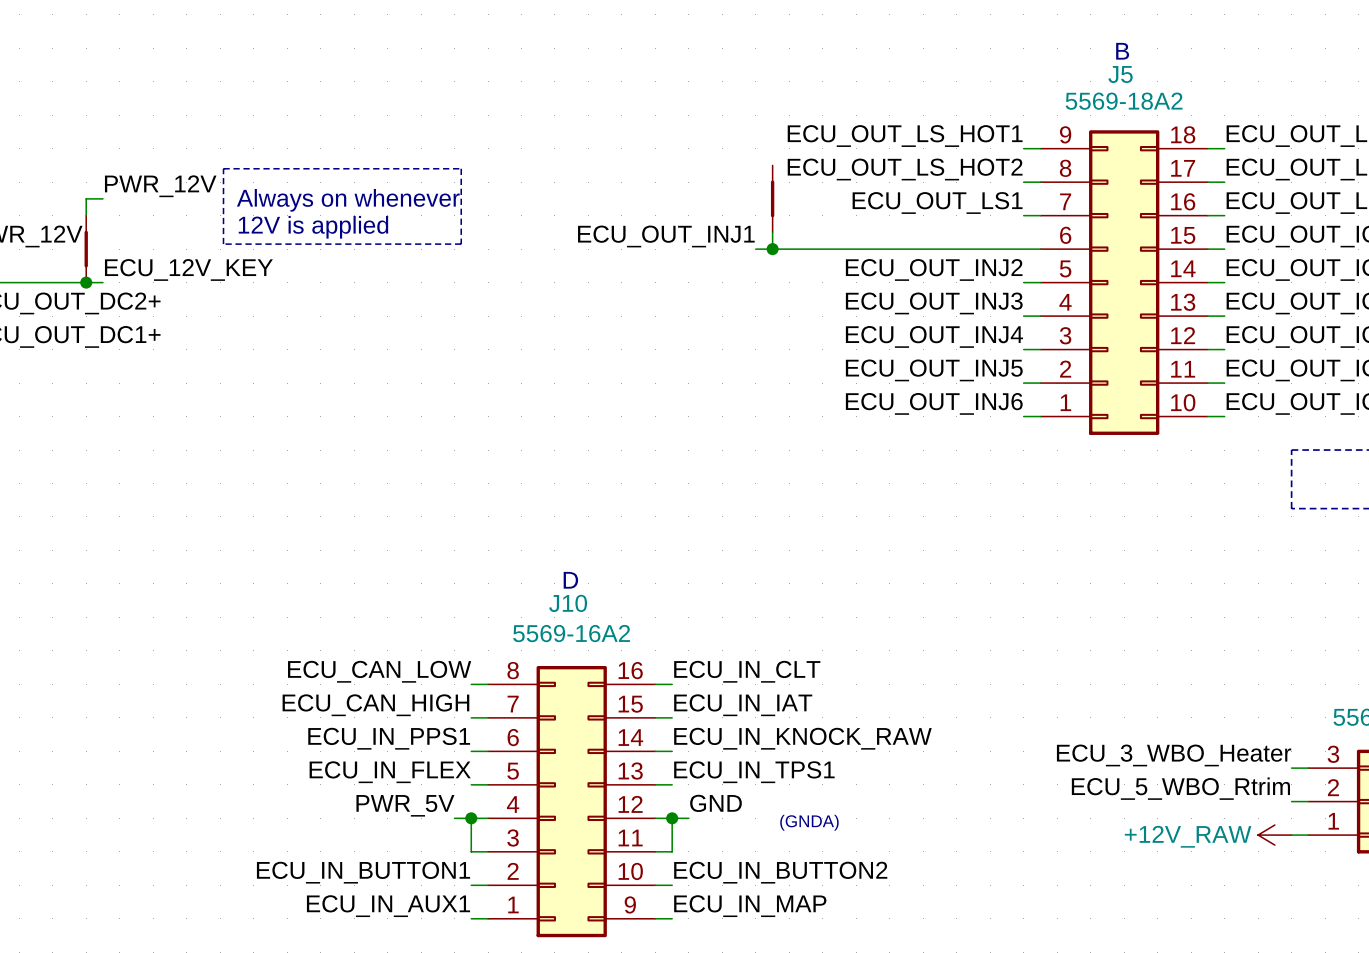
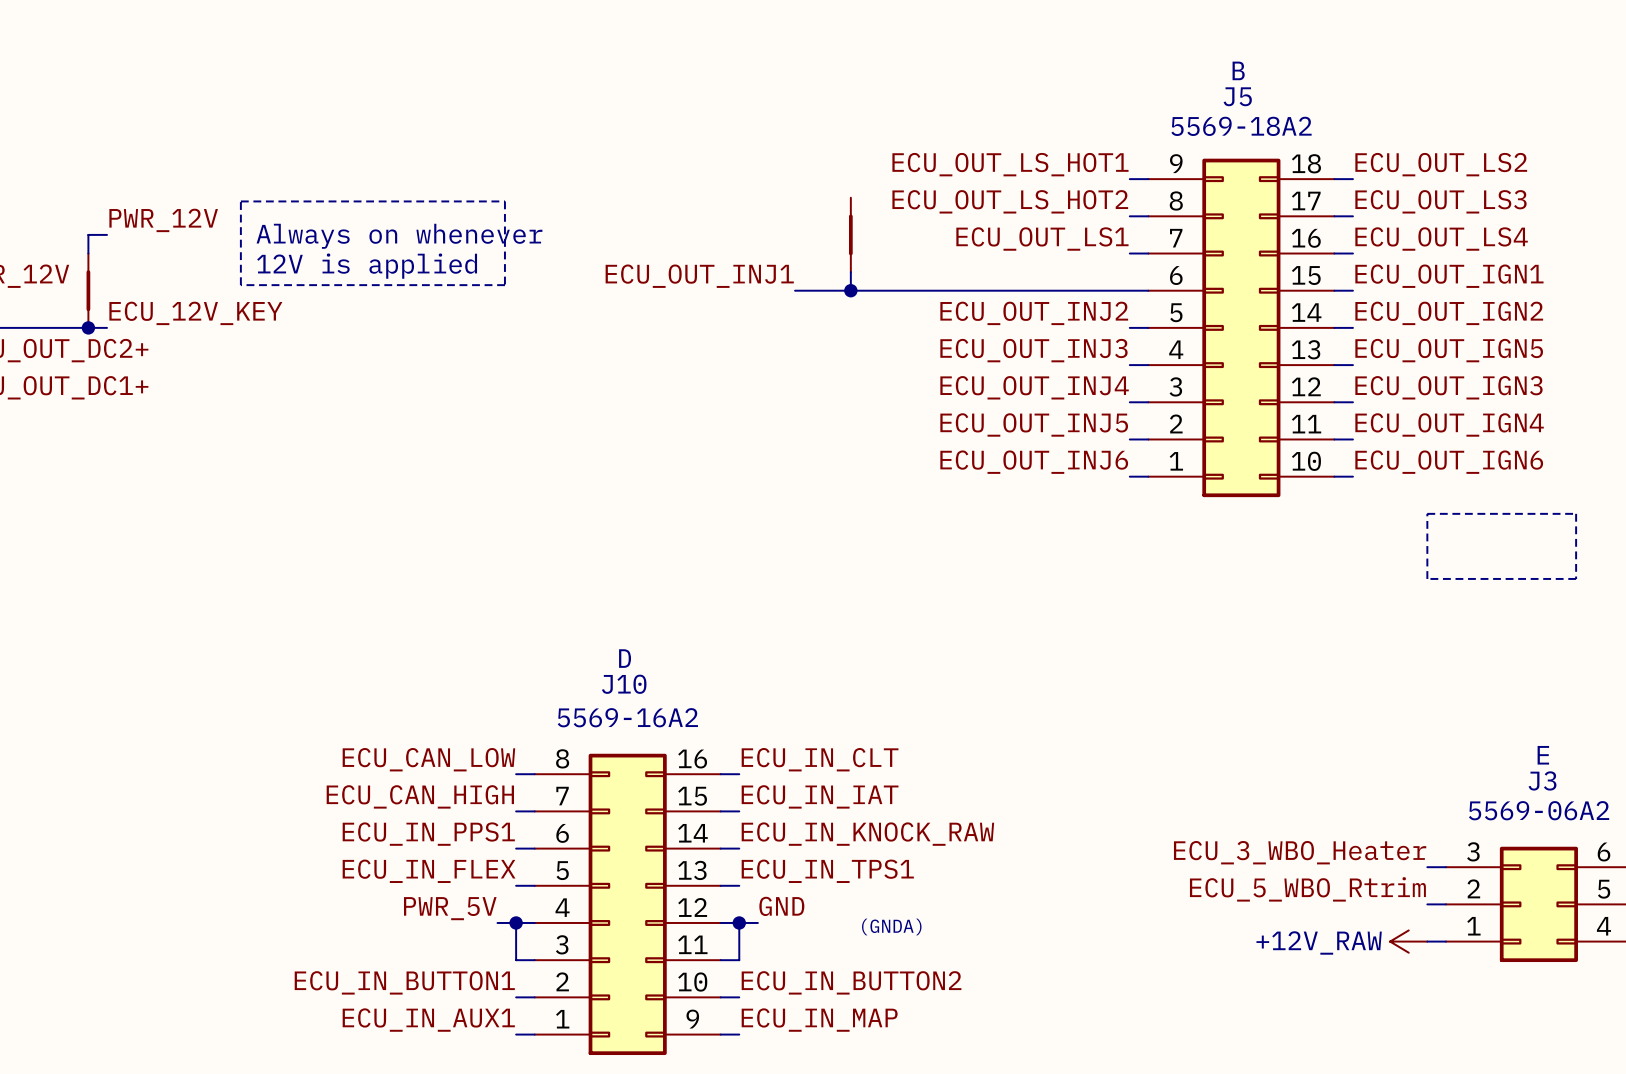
label position: ECU_OUT_INJ1 (666, 236) -> ECU_OUT_INJ1 (699, 276)
wire: none -> (795, 290) (832, 290)

